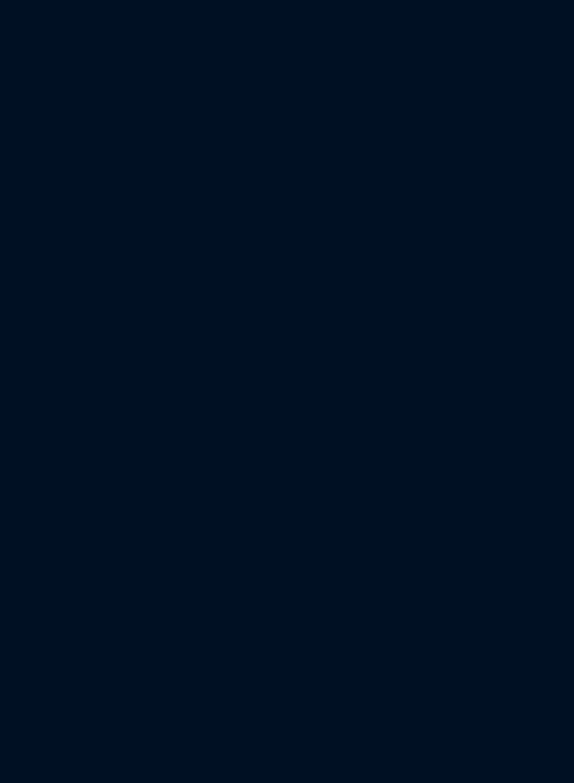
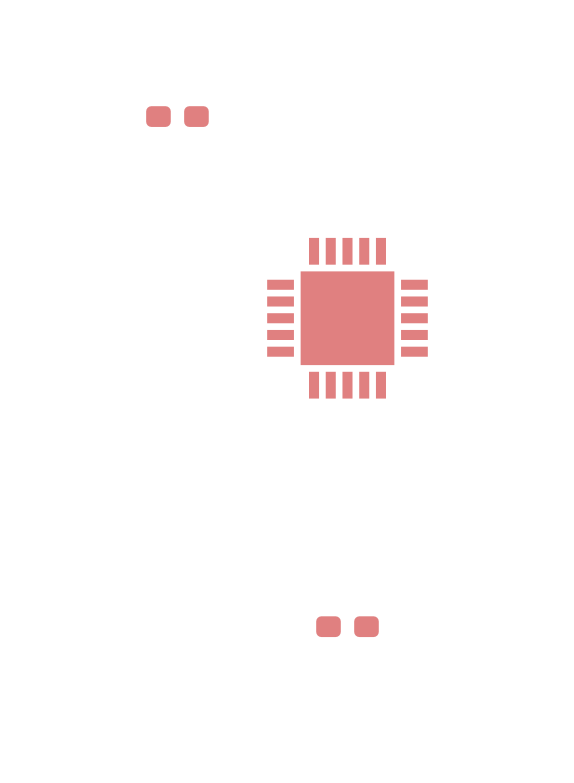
part: none -> (177, 116)
part: none -> (347, 318)
part: none -> (347, 626)

